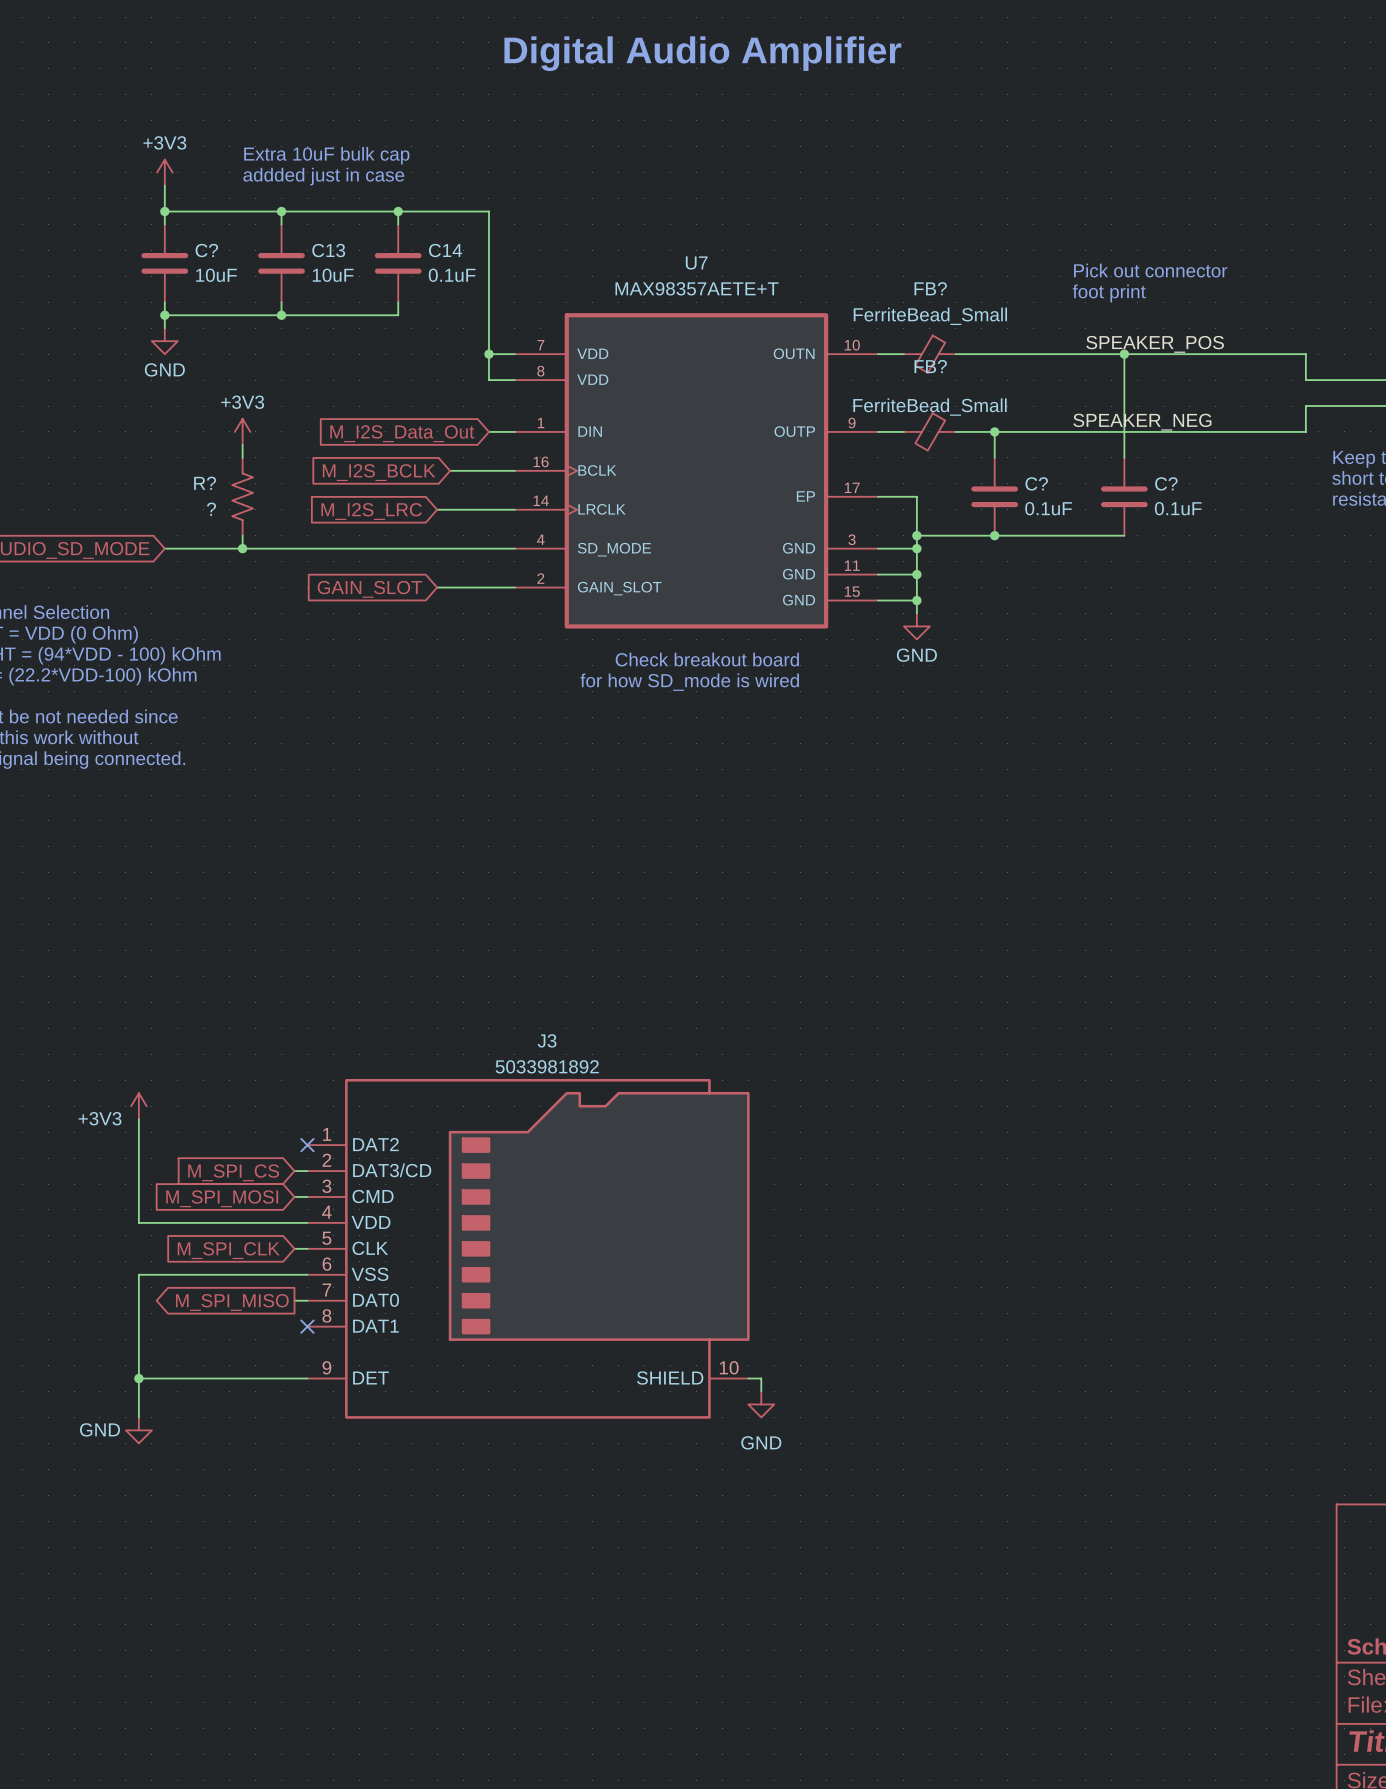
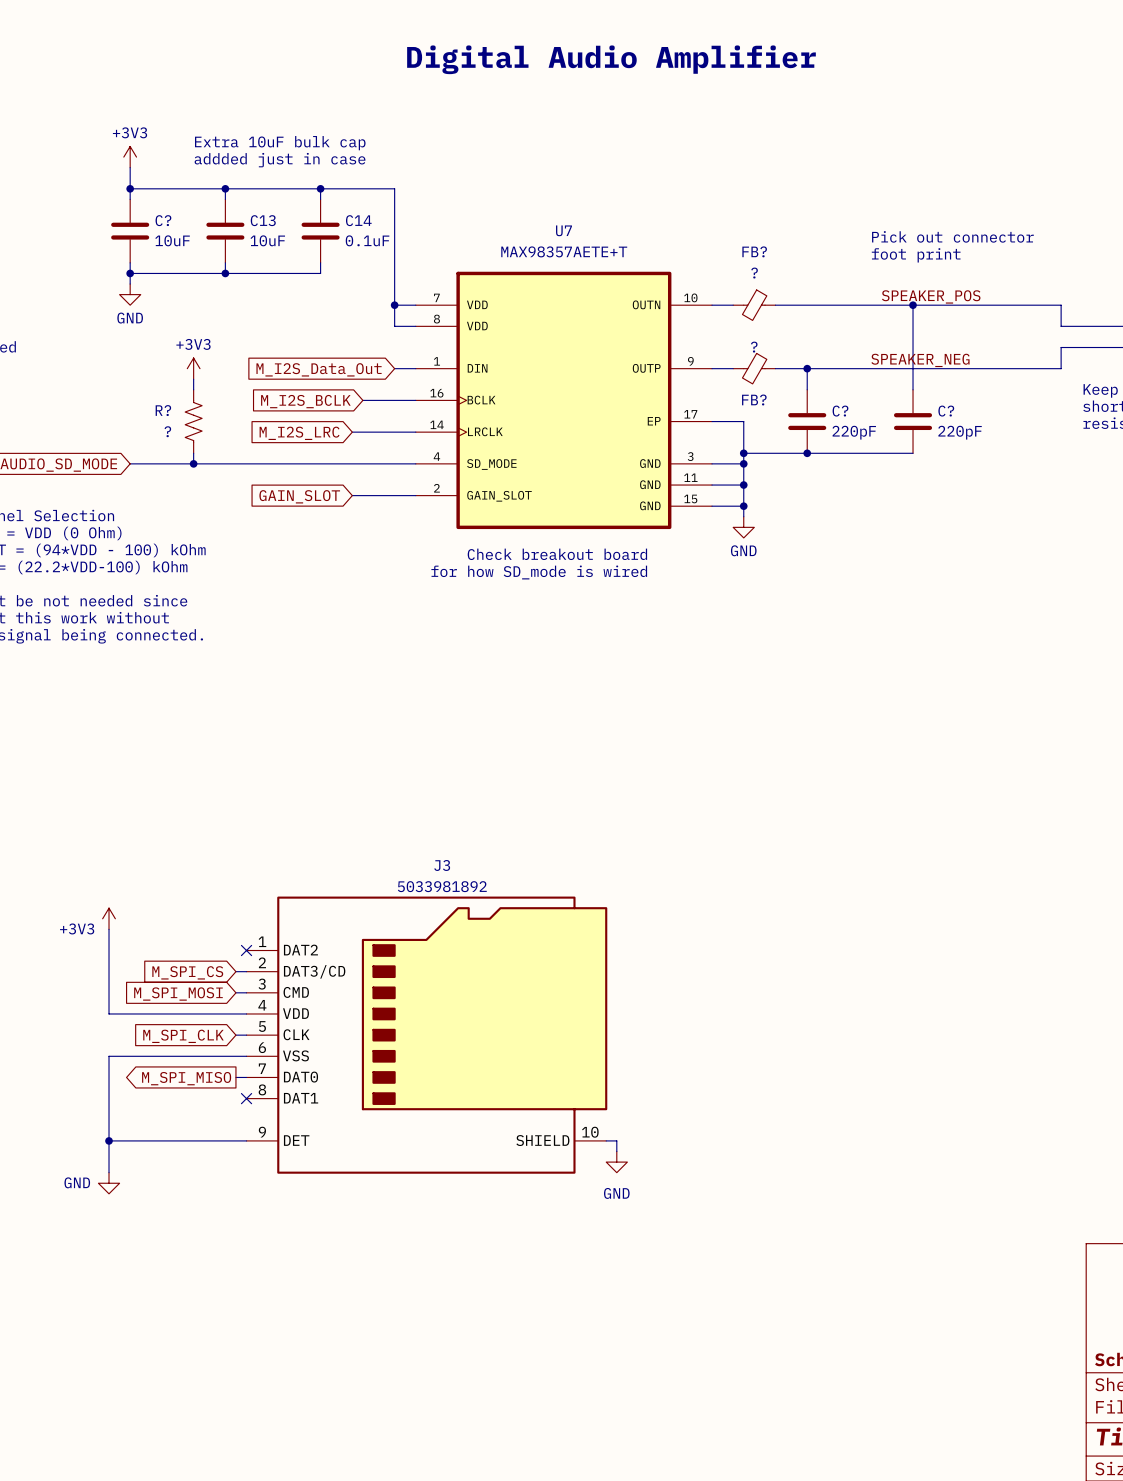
FB? value: FerriteBead_Small (930, 316) -> ? (754, 273)
FB? name position: FB? (930, 366) -> FB? (754, 399)
FB? value: FerriteBead_Small (930, 407) -> ? (754, 347)
C? value: 0.1uF (1048, 508) -> 220pF (854, 432)
C? value: 0.1uF (1178, 508) -> 220pF (960, 432)

